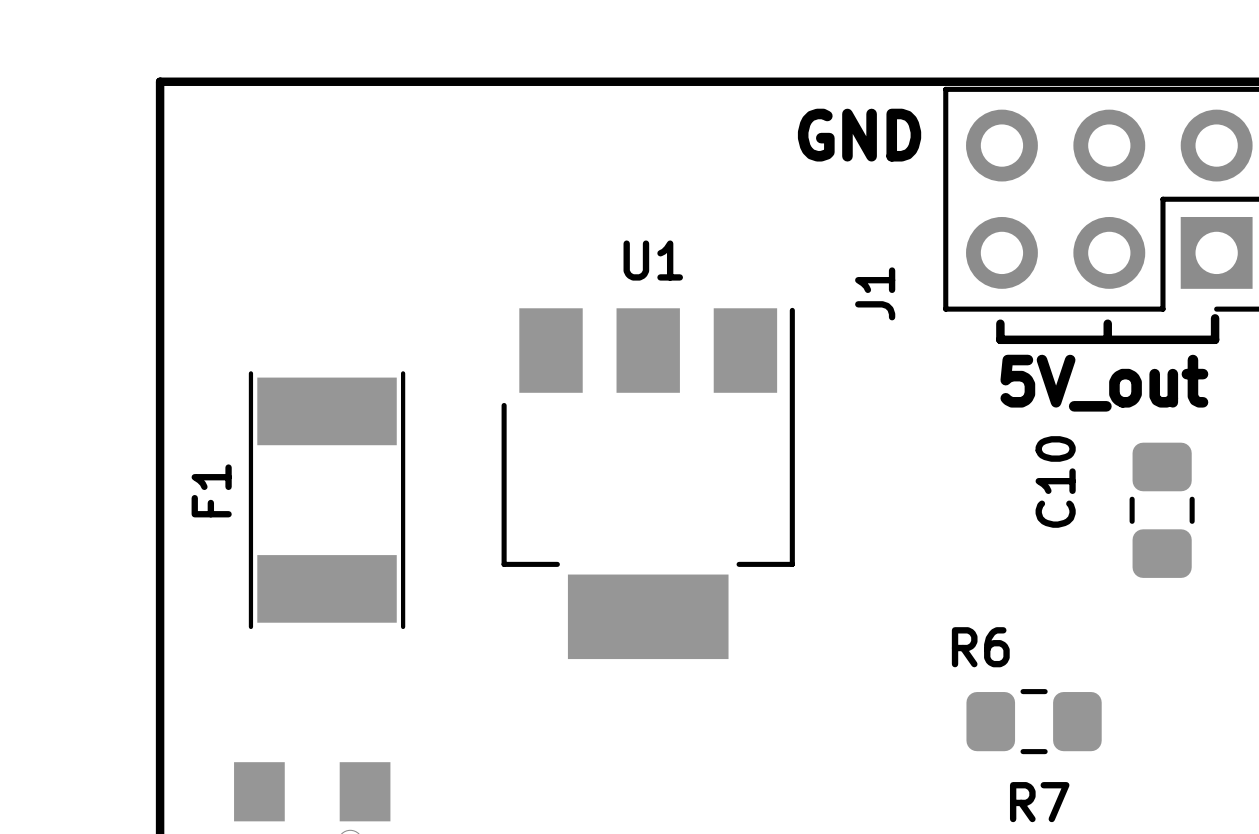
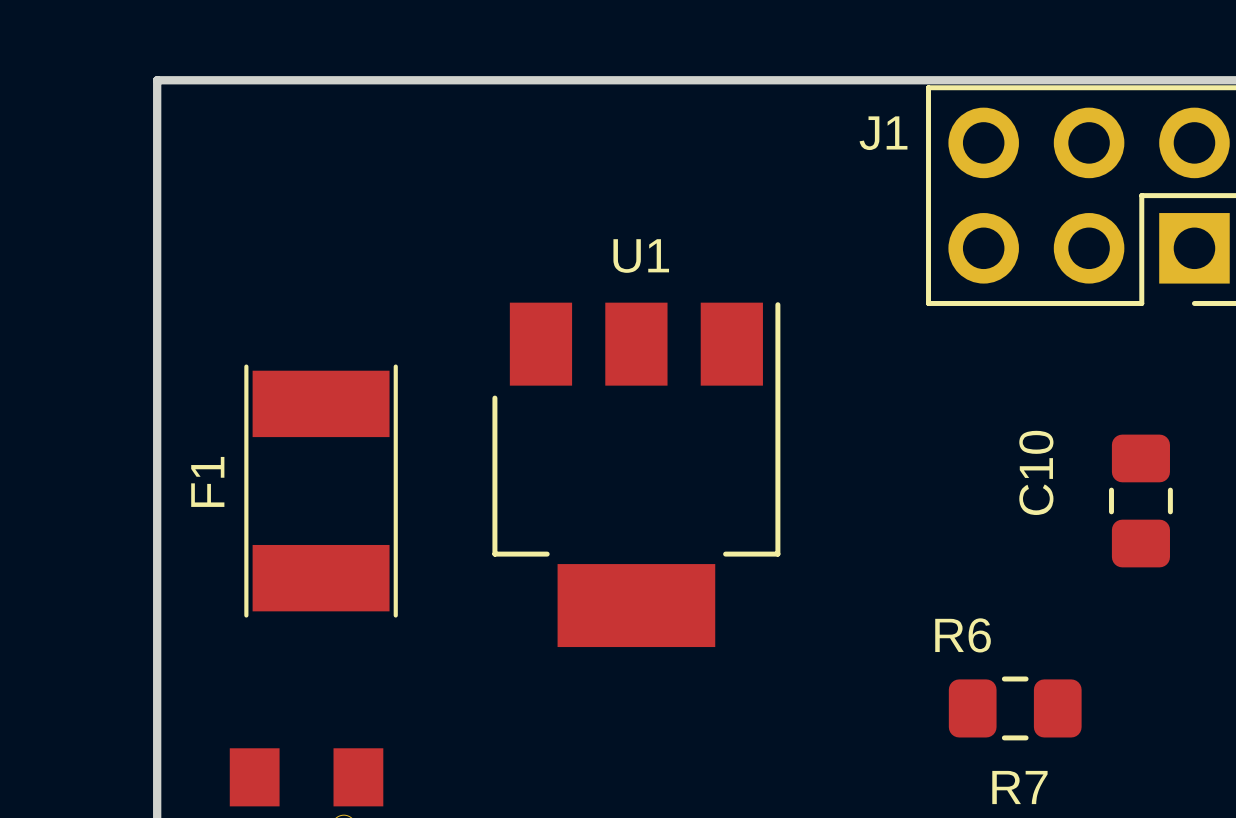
text: GND (859, 135) -> none
J1 name rotation: 0° (875, 293) -> 90° clockwise (883, 133)
J1 name position: J1 (875, 293) -> J1 (883, 133)
line: (1215, 318) (1215, 339) (1000, 339) (1000, 323) -> none
line: (1107, 323) (1107, 339) -> none
text: 5V_out (1104, 383) -> none

